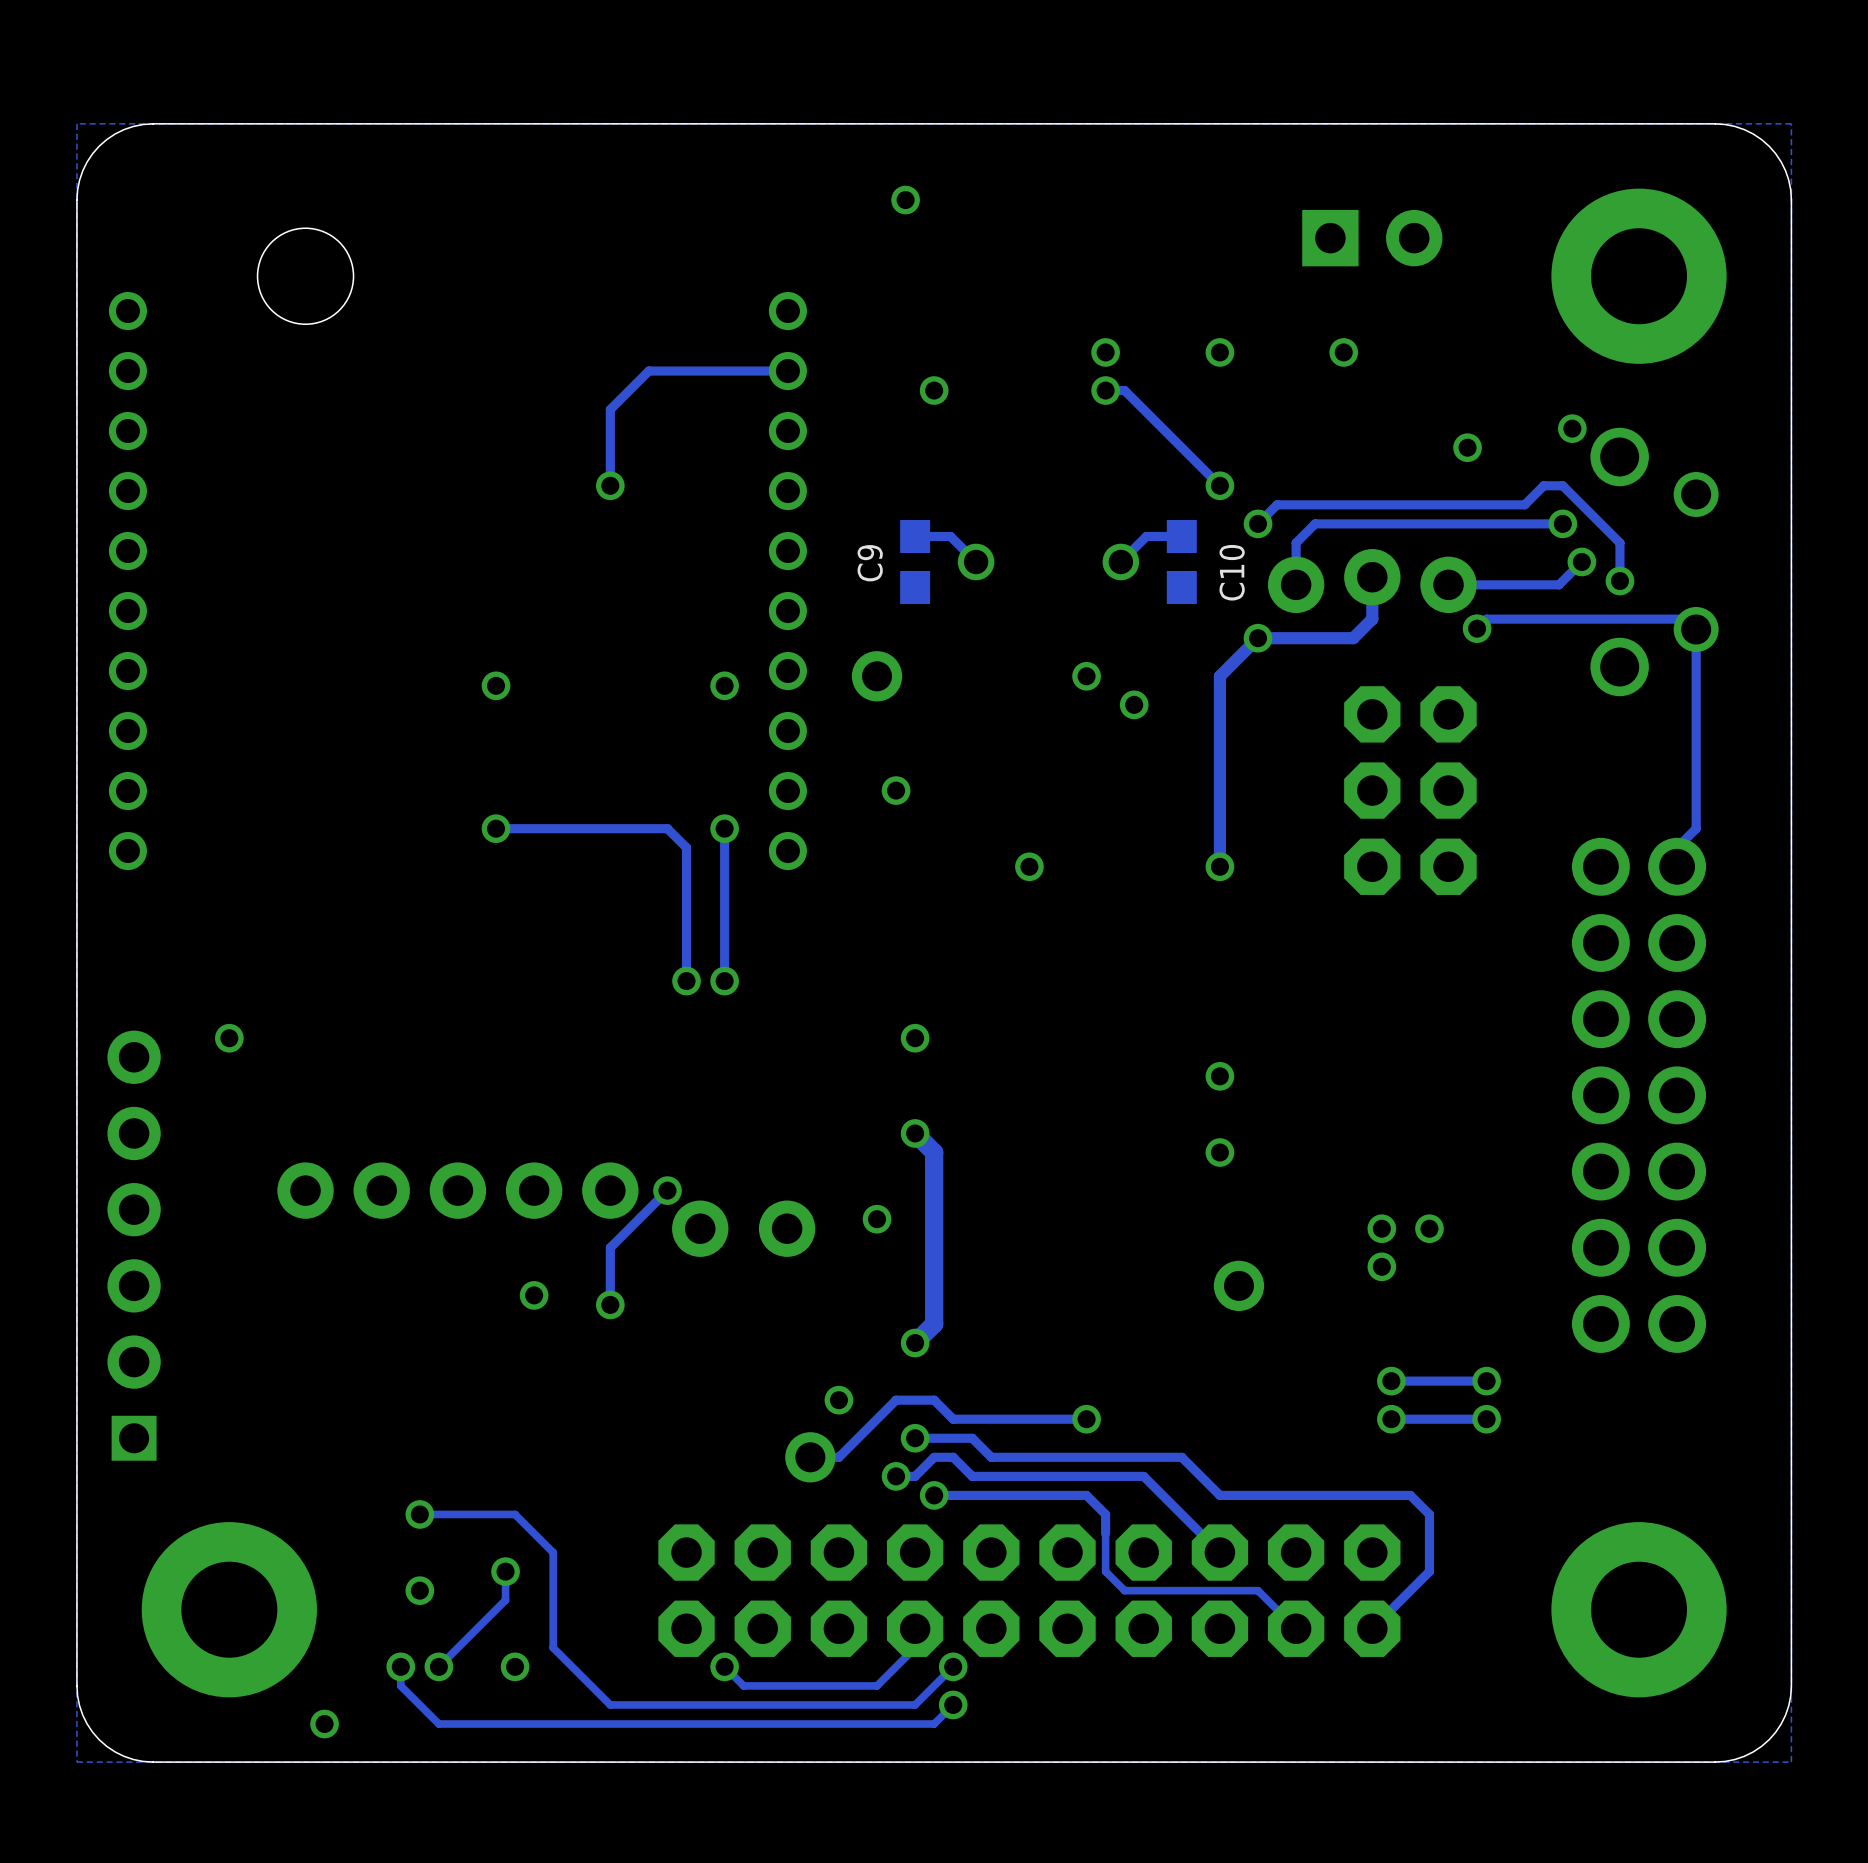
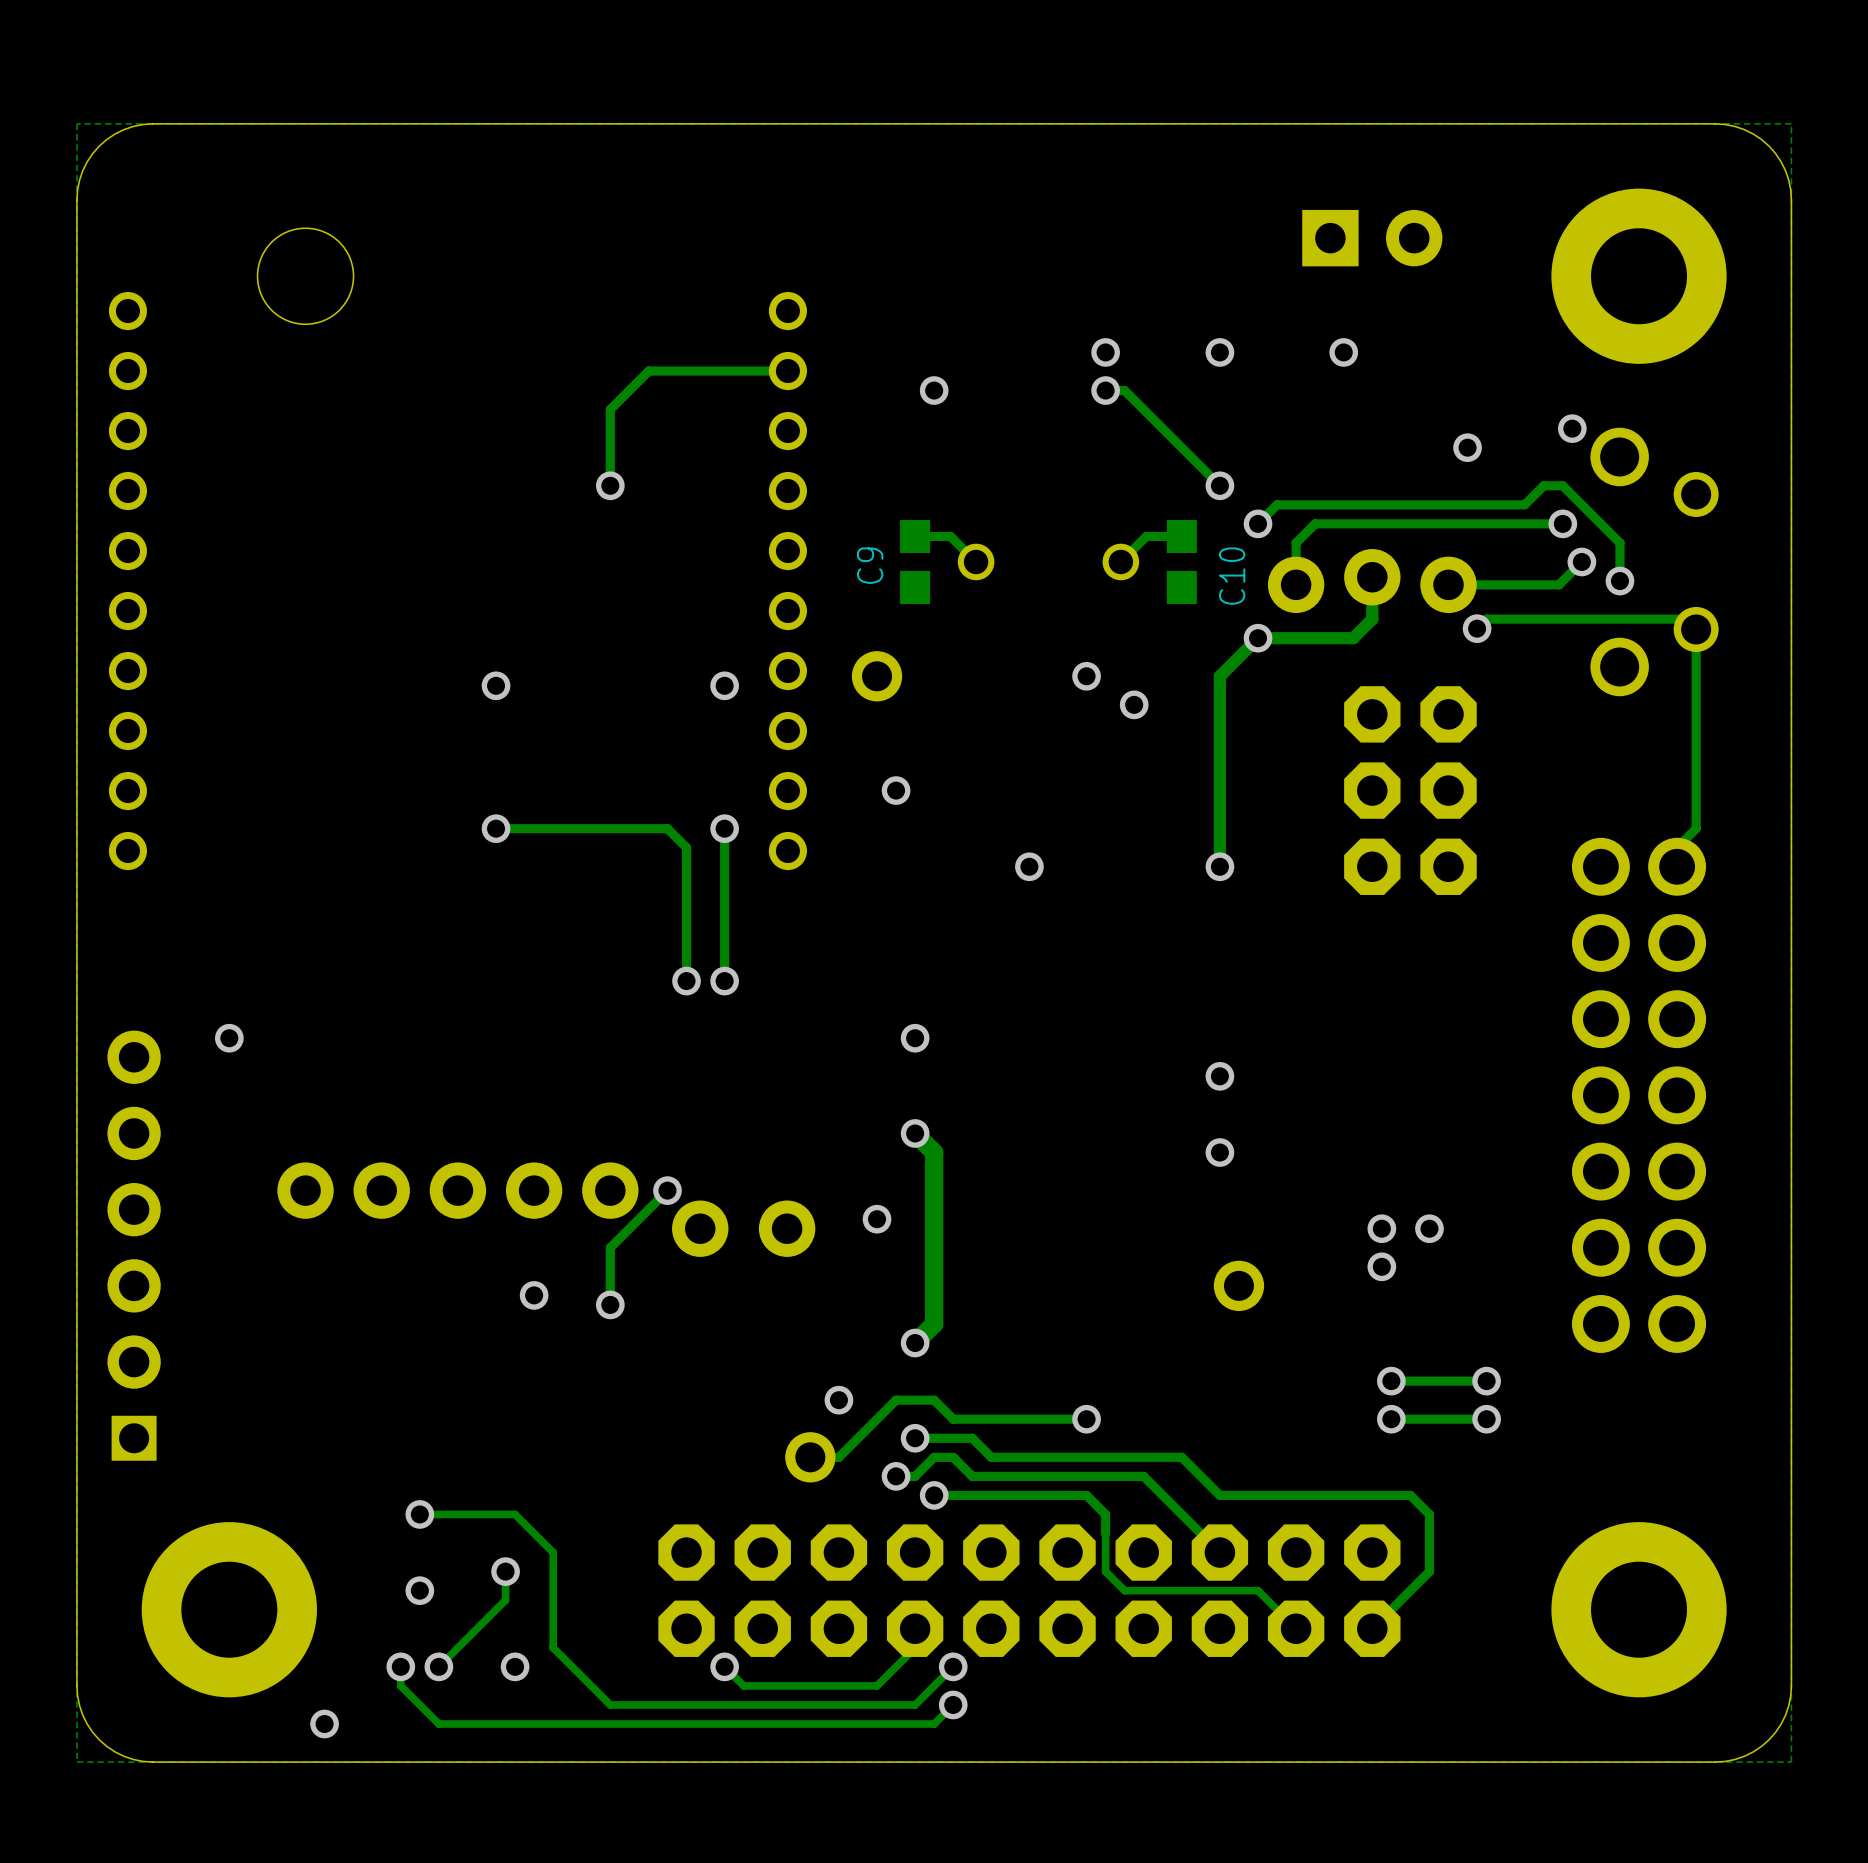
via: (905, 200) -> none

